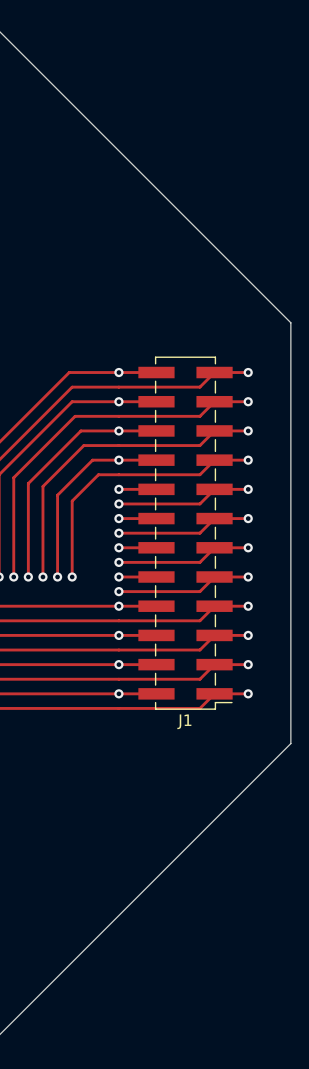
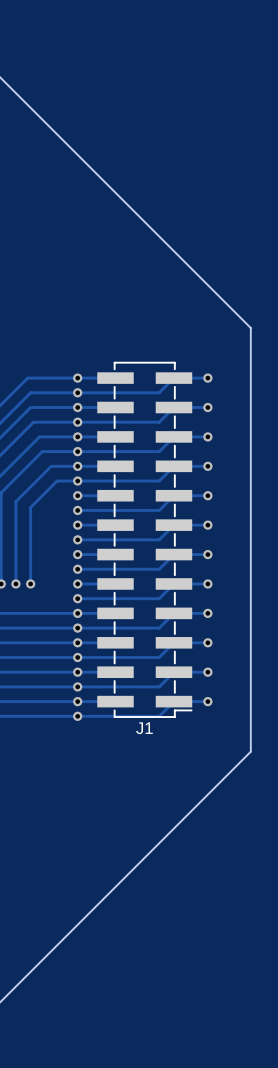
via: none -> (77, 392)
via: none -> (77, 422)
via: none -> (77, 451)
via: none -> (77, 481)
via: none -> (77, 628)
via: none -> (77, 657)
via: none -> (77, 686)
via: none -> (77, 716)

